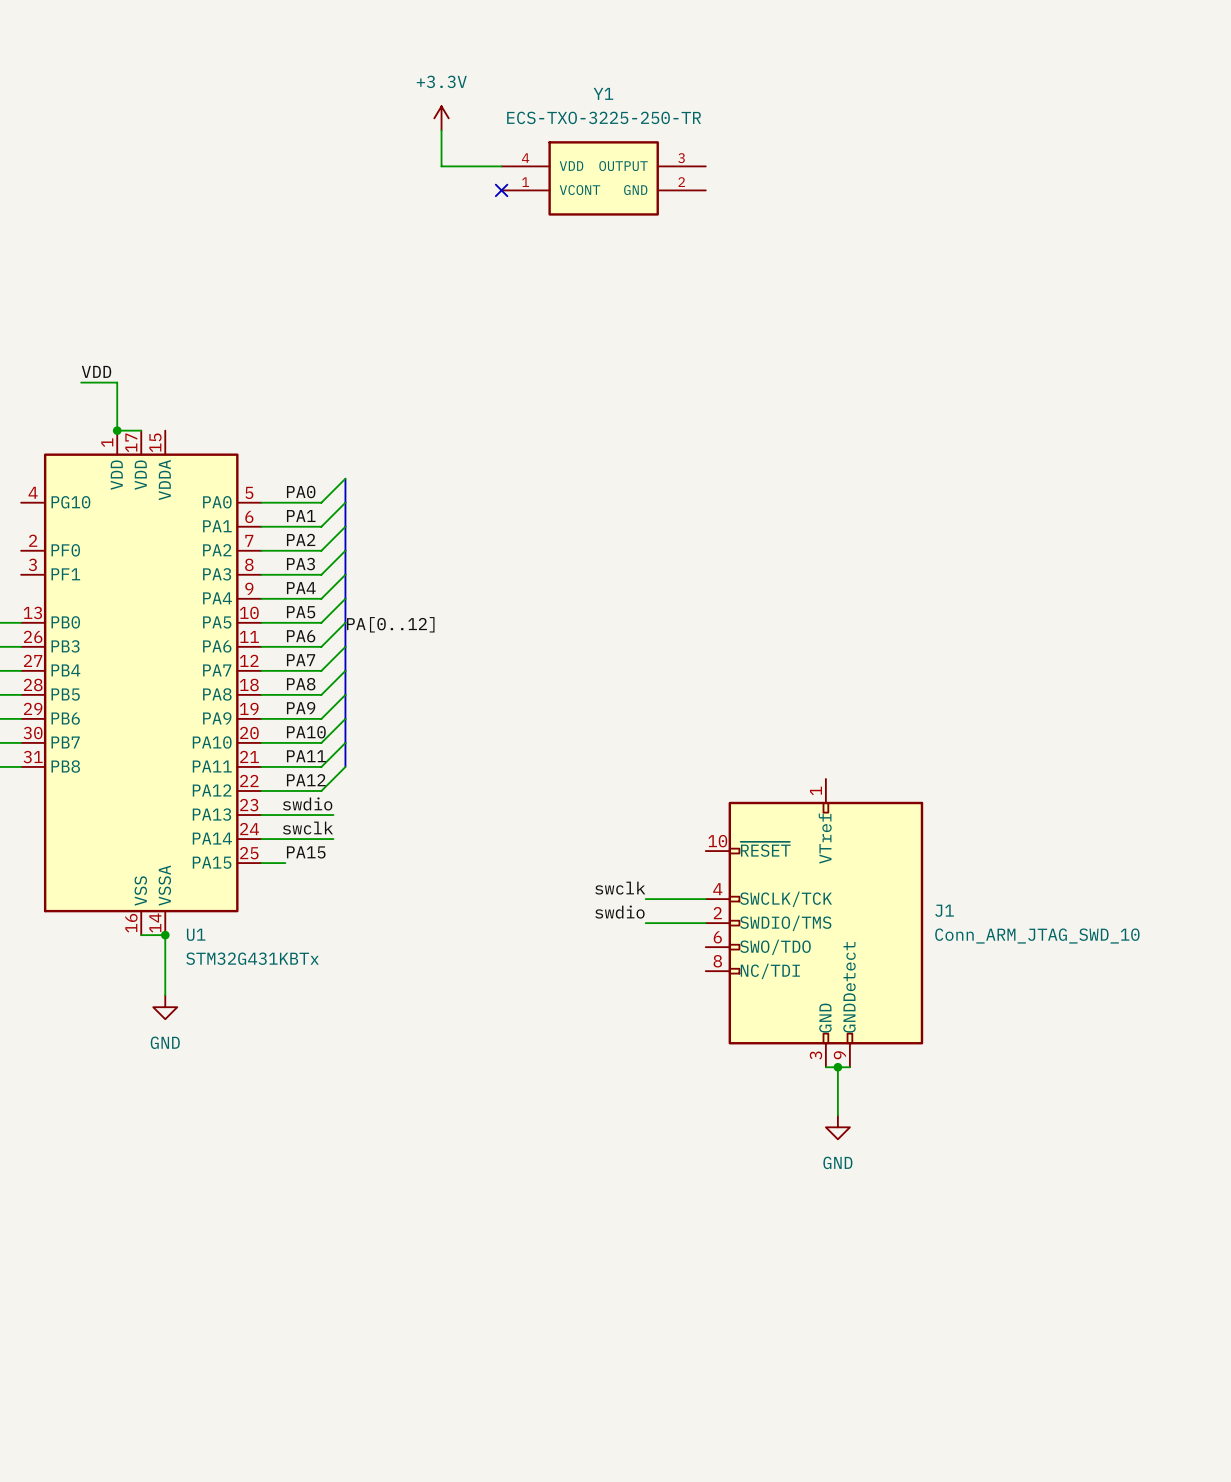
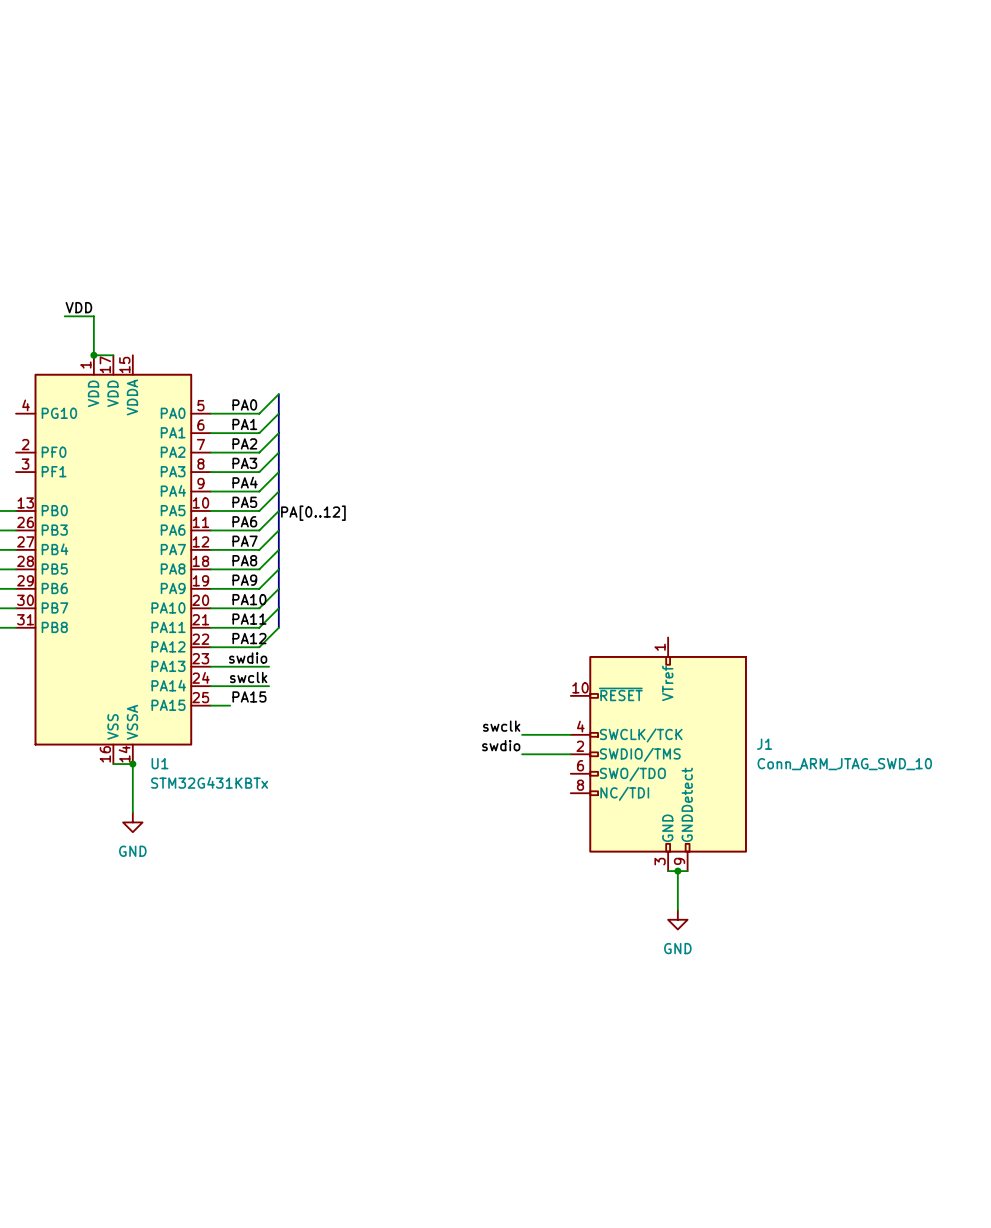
power symbol: +3.3V (441, 118) -> none
wire: (441, 130) (441, 166) (501, 166) -> none
Y1: ECS-TXO-3225-250-TR (603, 178) -> none
no-connect mark: (501, 190) -> none

